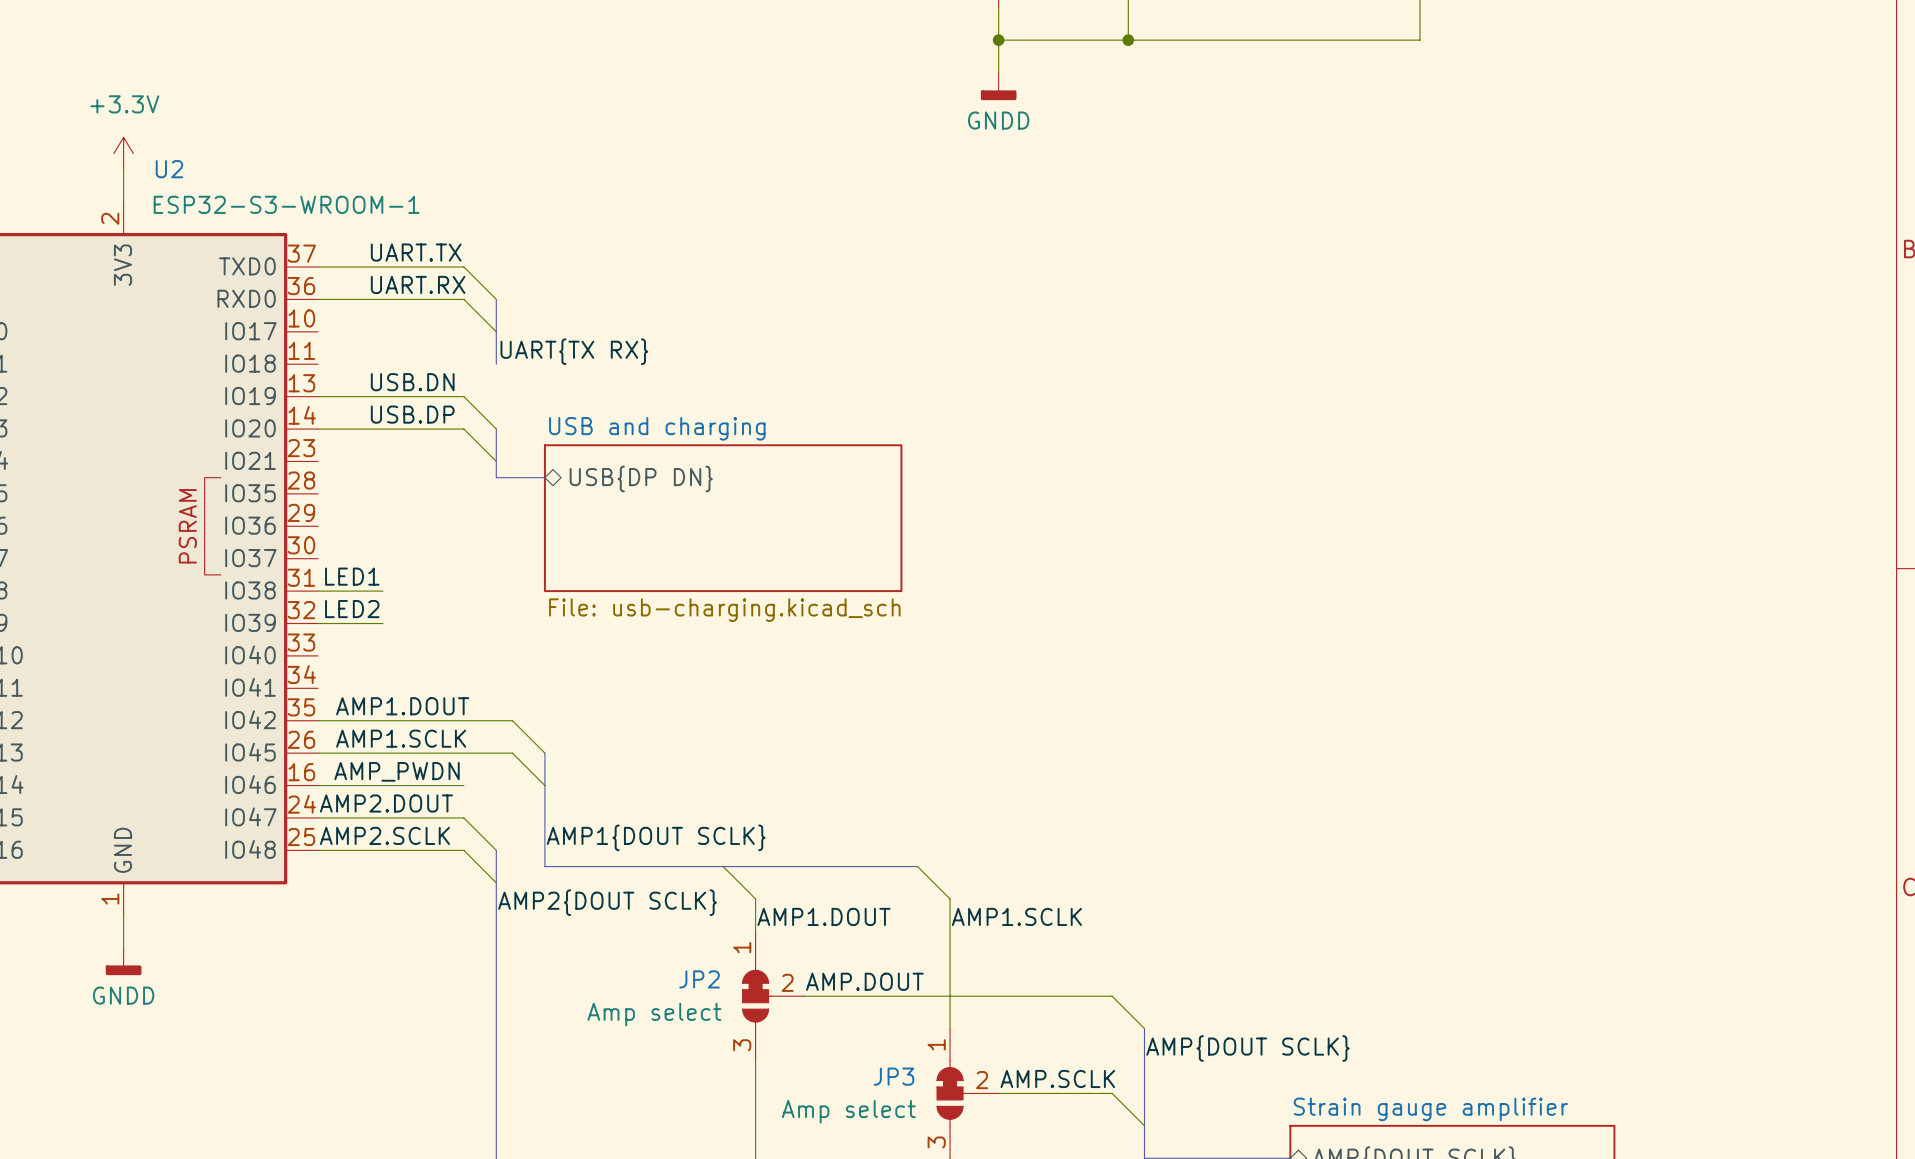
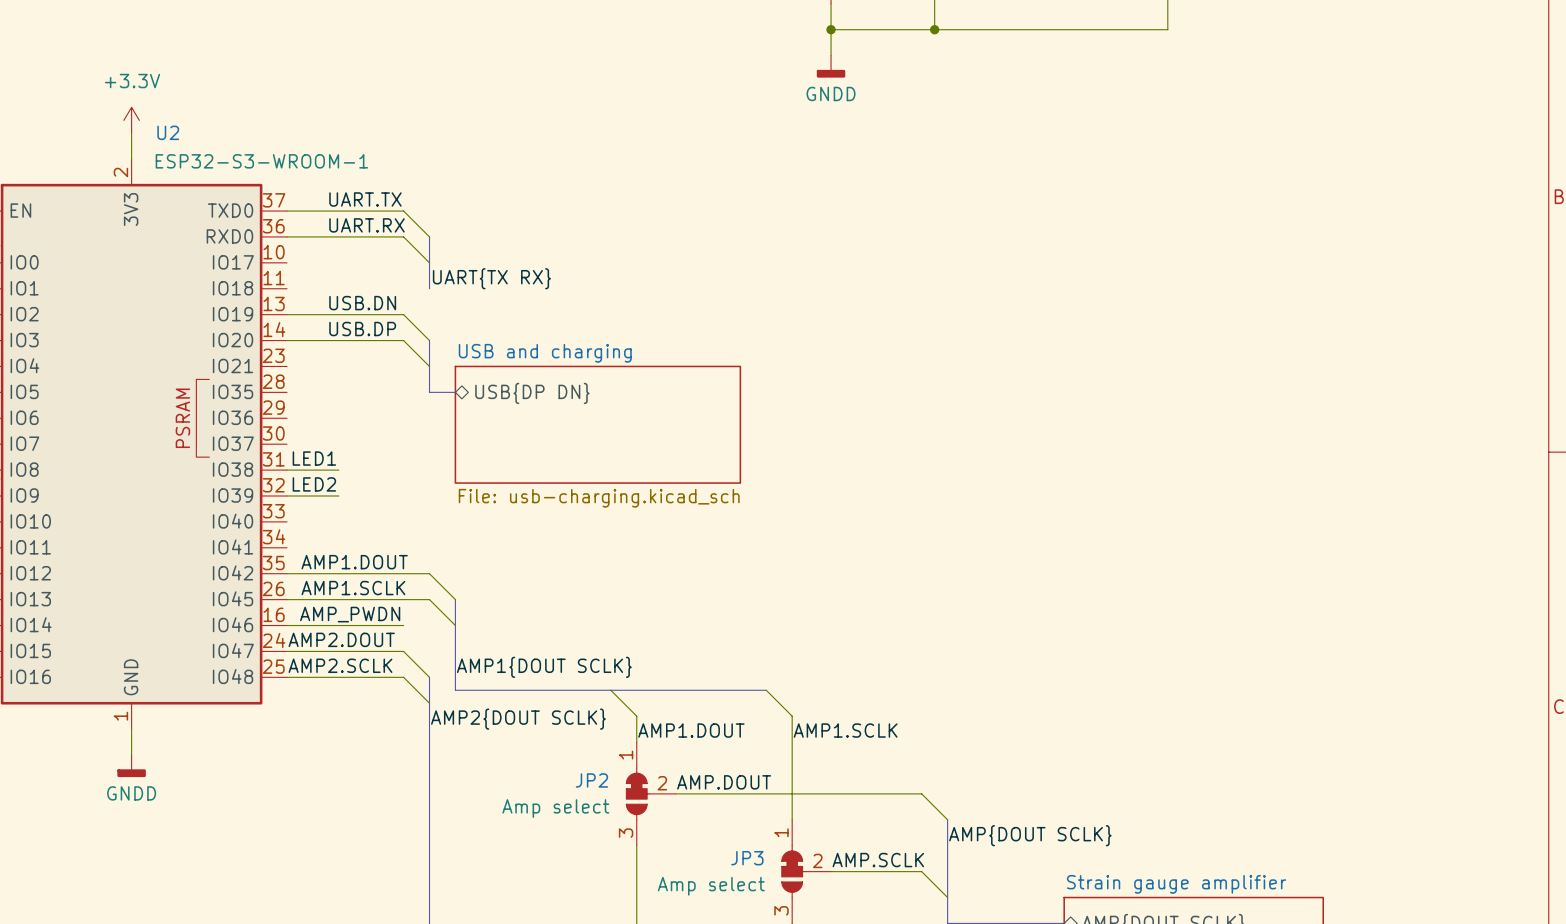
bus: (496, 477) (544, 477) -> (429, 379) (429, 392) (455, 392)
sheet pin position: USB{DP DN} (641, 478) -> USB{DP DN} (532, 393)
sheet USB and charging position: (723, 518) -> (597, 424)
wire: (496, 720) (512, 720) (544, 753) -> (429, 573) (455, 599)
wire: (496, 753) (512, 753) (544, 785) -> (429, 599) (455, 625)
bus: (544, 753) (544, 866) -> (455, 599) (455, 690) (468, 690)
label position: AMP1{DOUT SCLK} (656, 837) -> AMP1{DOUT SCLK} (544, 667)

